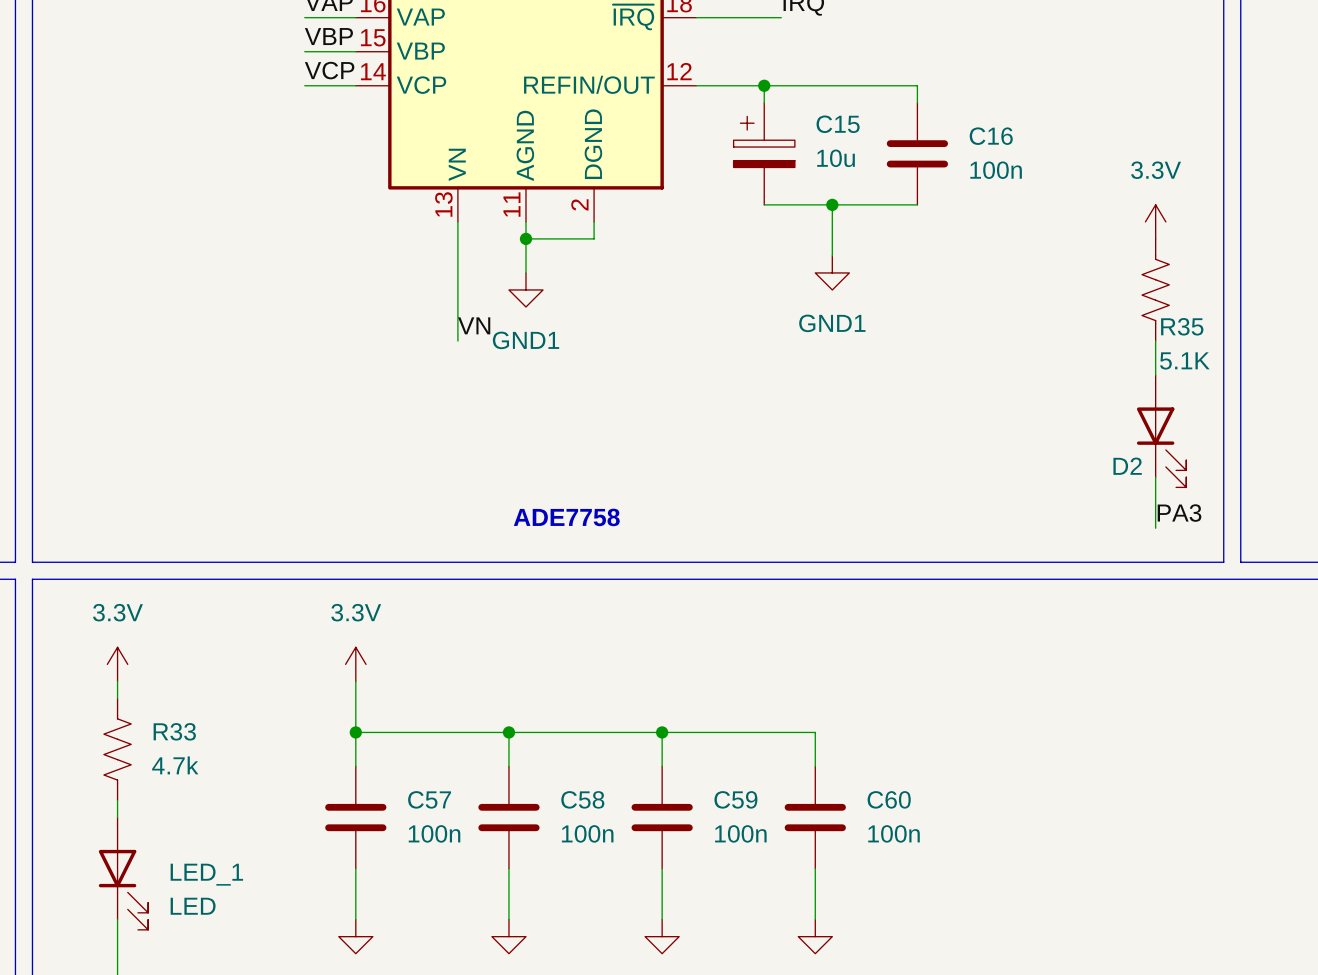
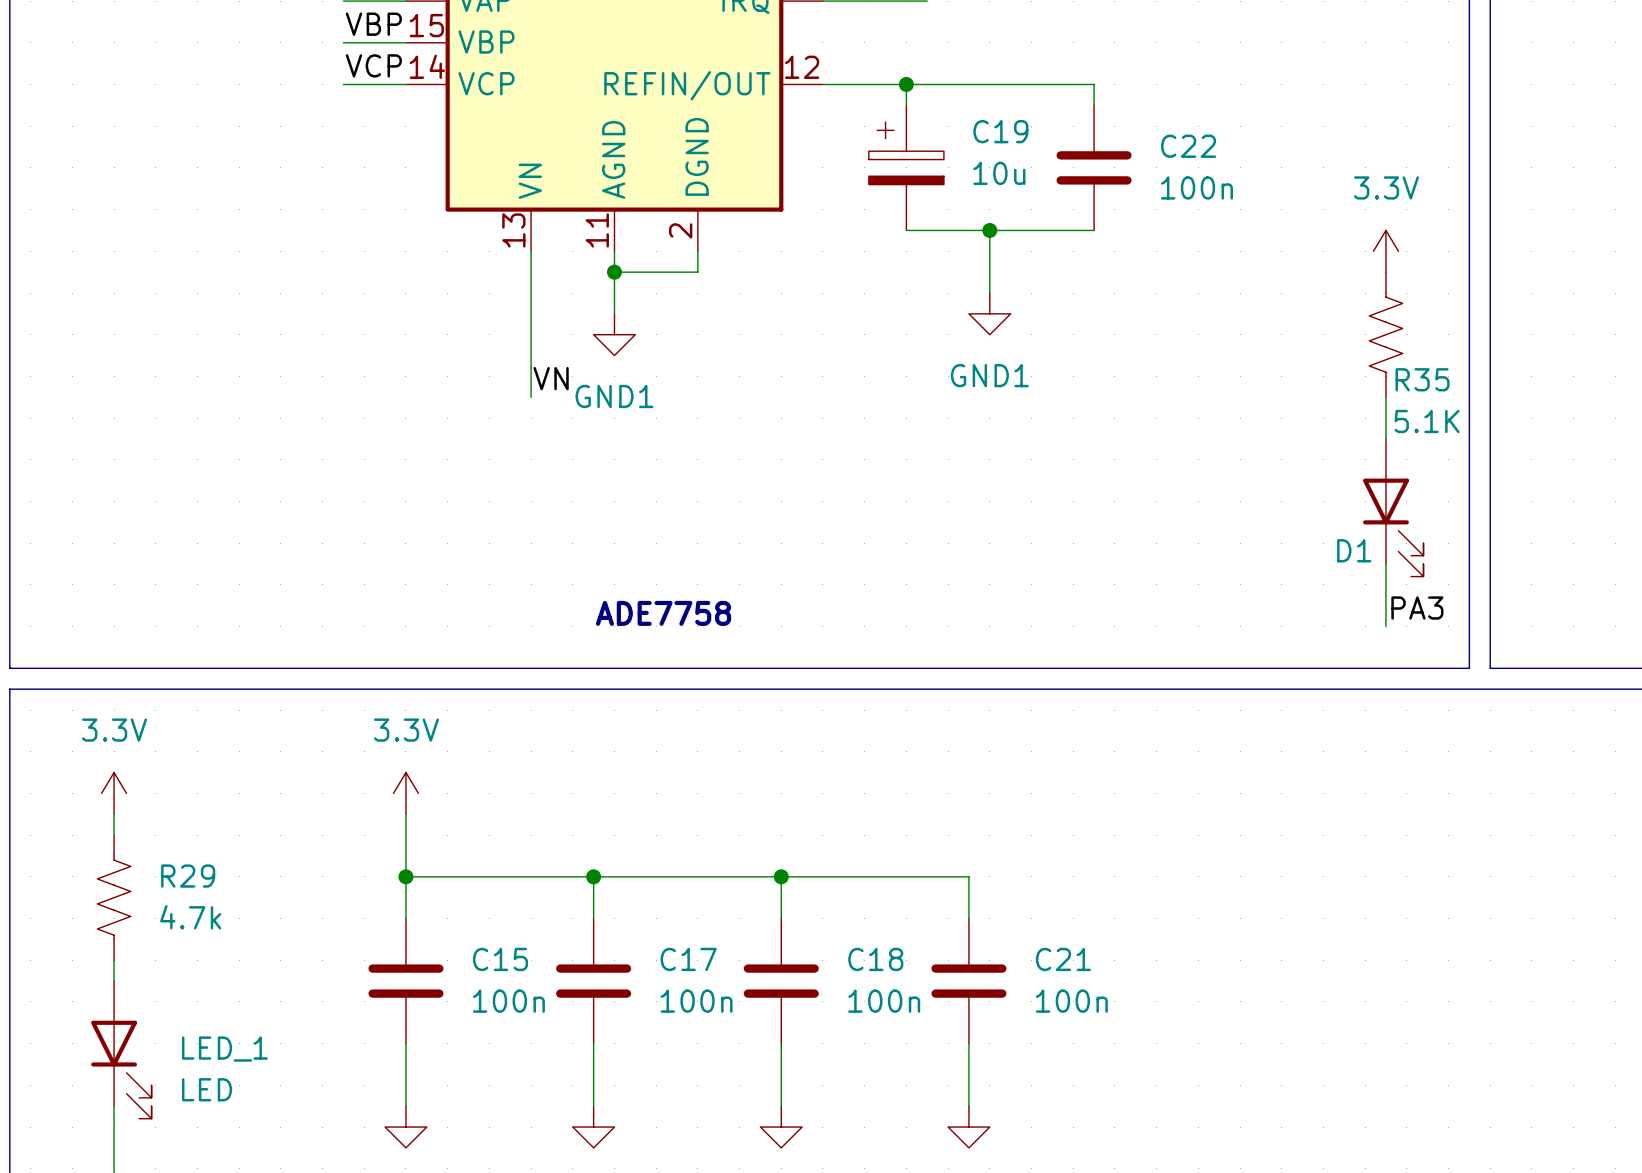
C15 name: C15 (838, 124) -> C19 (1000, 131)
C16 name: C16 (991, 136) -> C22 (1188, 146)
D2 name: D2 (1127, 466) -> D1 (1354, 550)
R33 name: R33 (174, 731) -> R29 (188, 876)
C57 name: C57 (429, 799) -> C15 (500, 959)
C58 name: C58 (582, 799) -> C17 (688, 959)
C59 name: C59 (735, 799) -> C18 (875, 959)
C60 name: C60 (889, 799) -> C21 (1063, 959)

